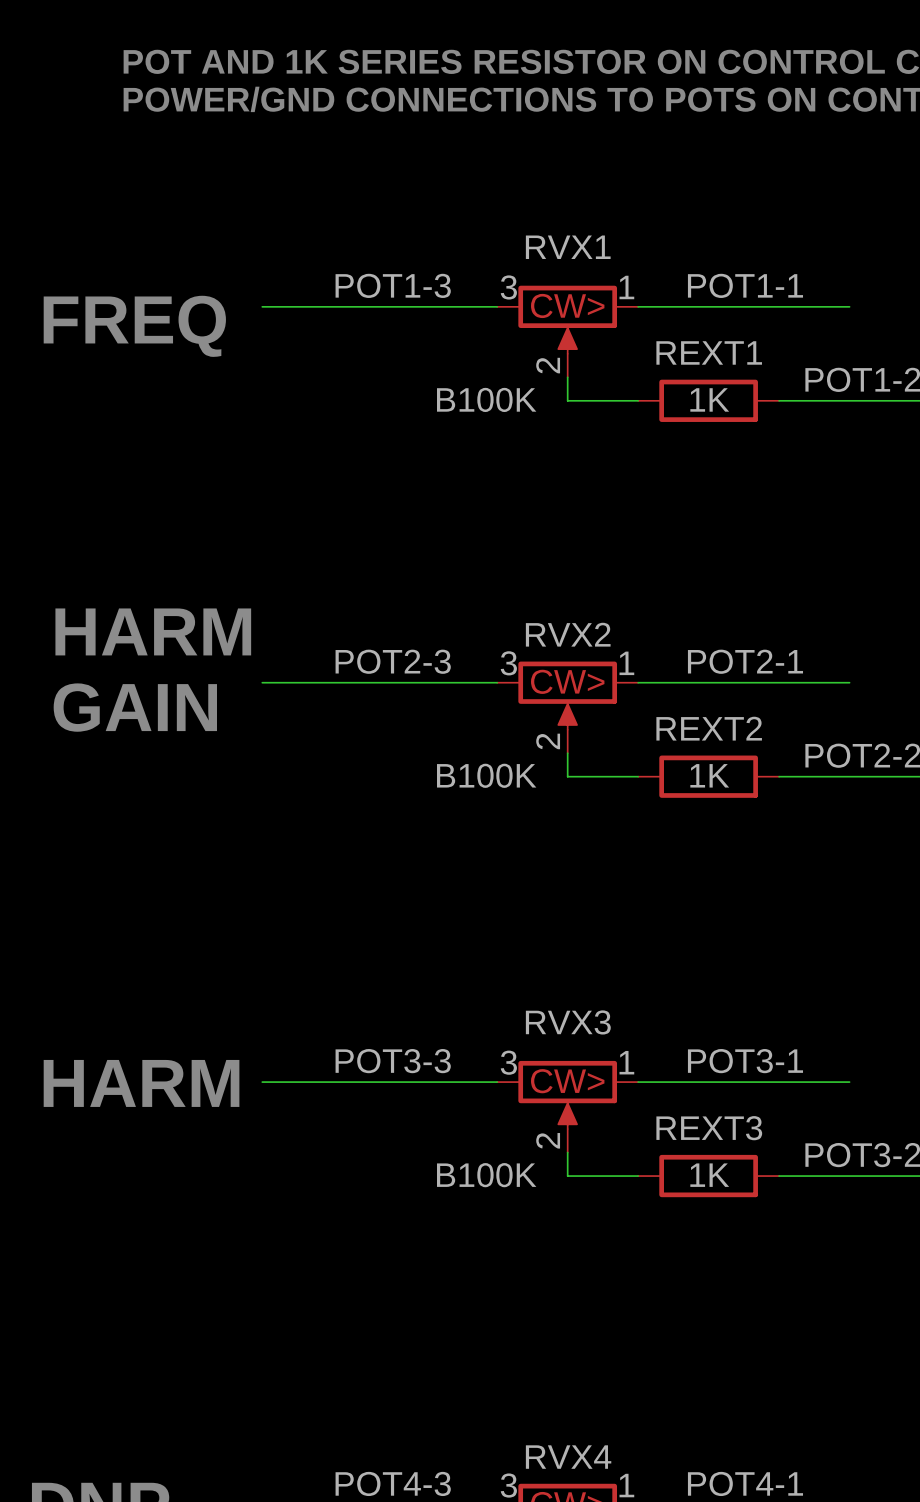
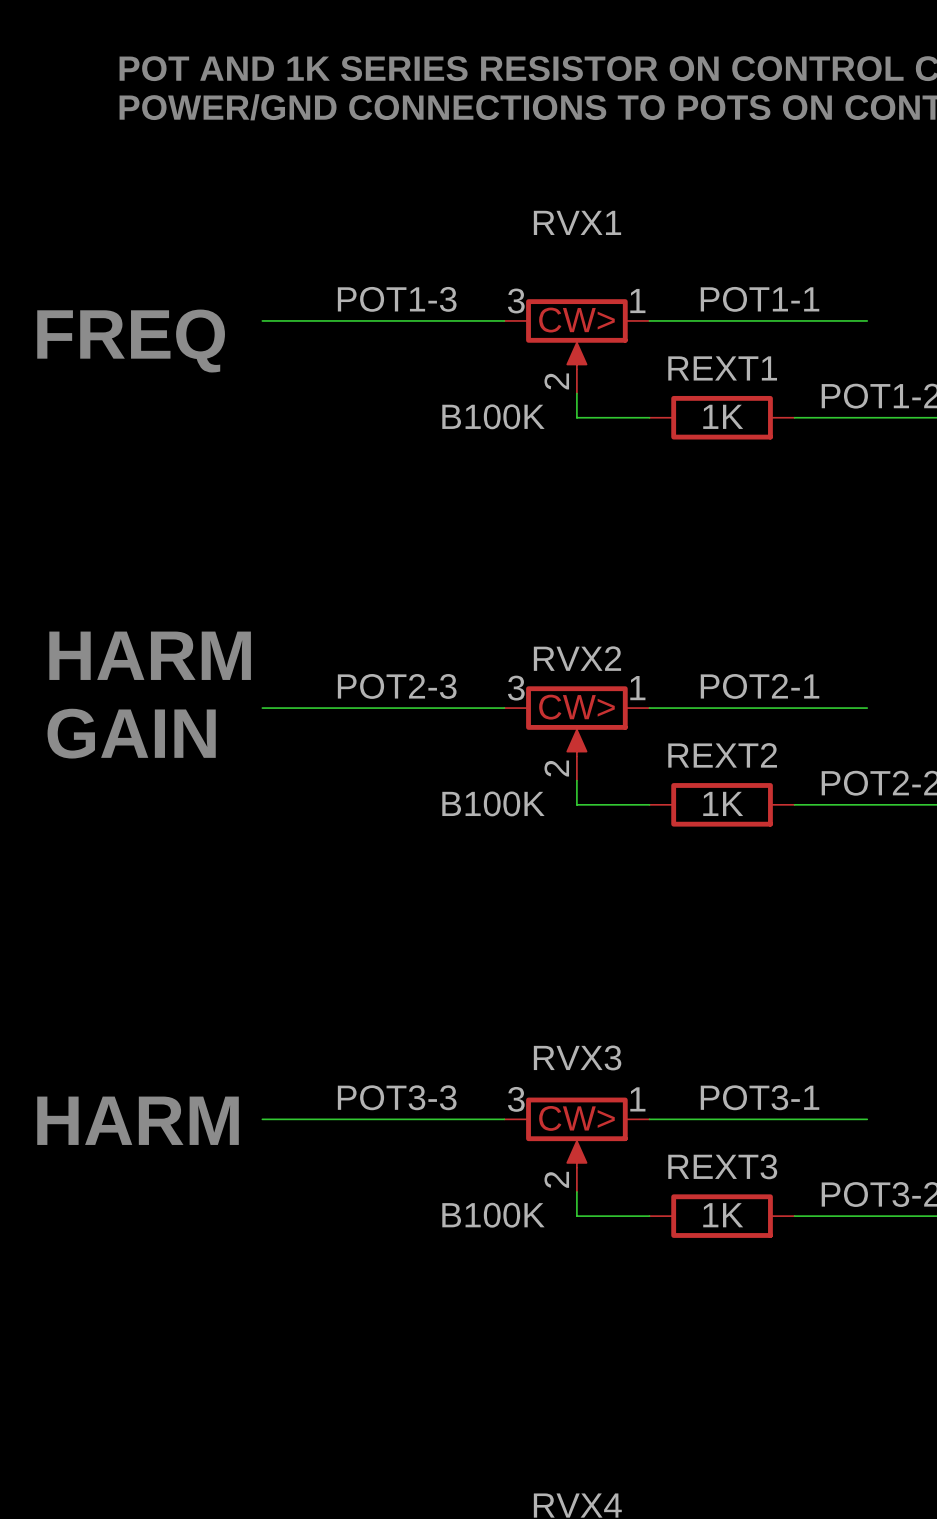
RVX1 name position: RVX1 (568, 247) -> RVX1 (577, 222)

